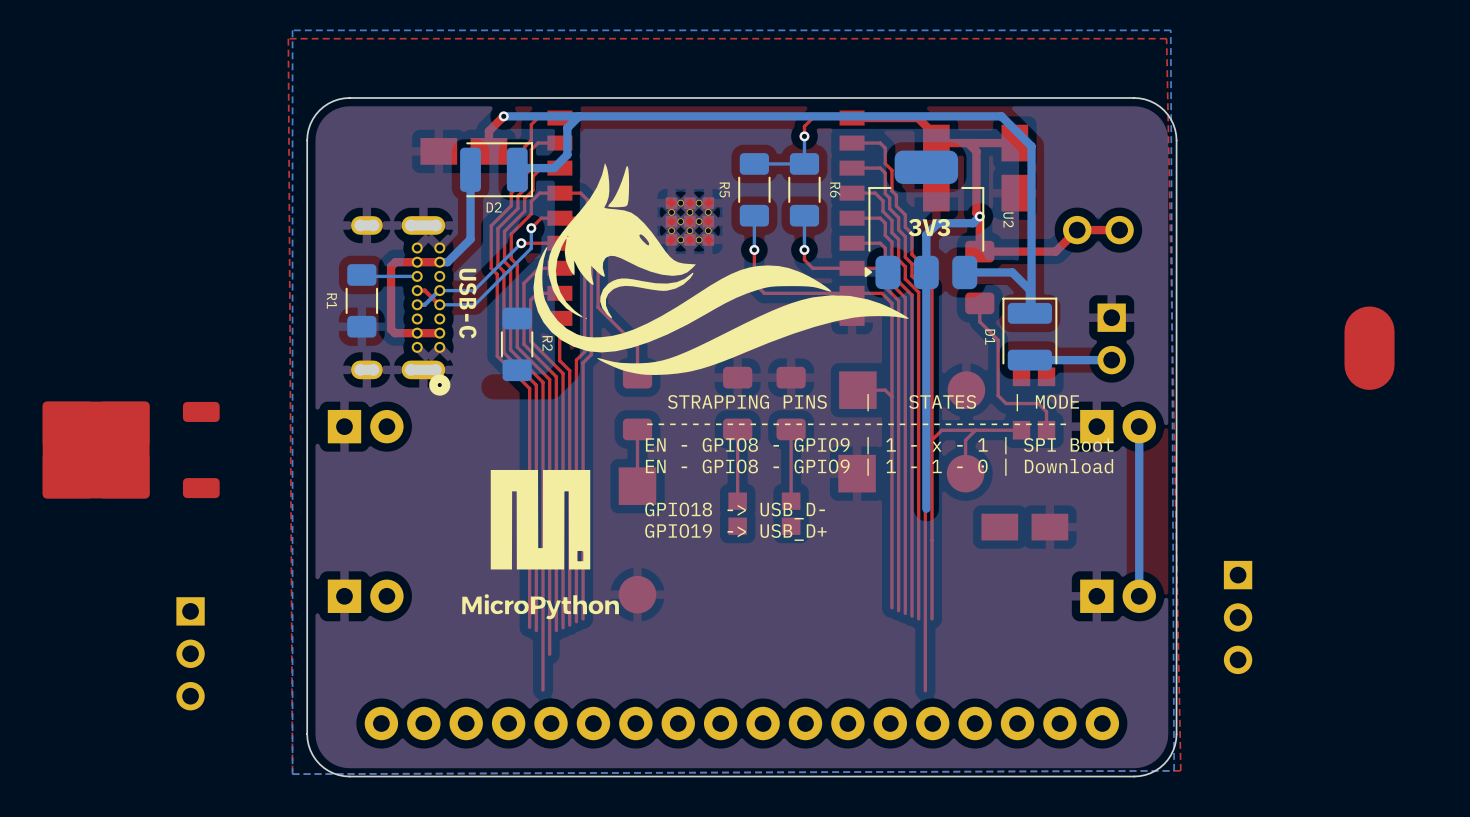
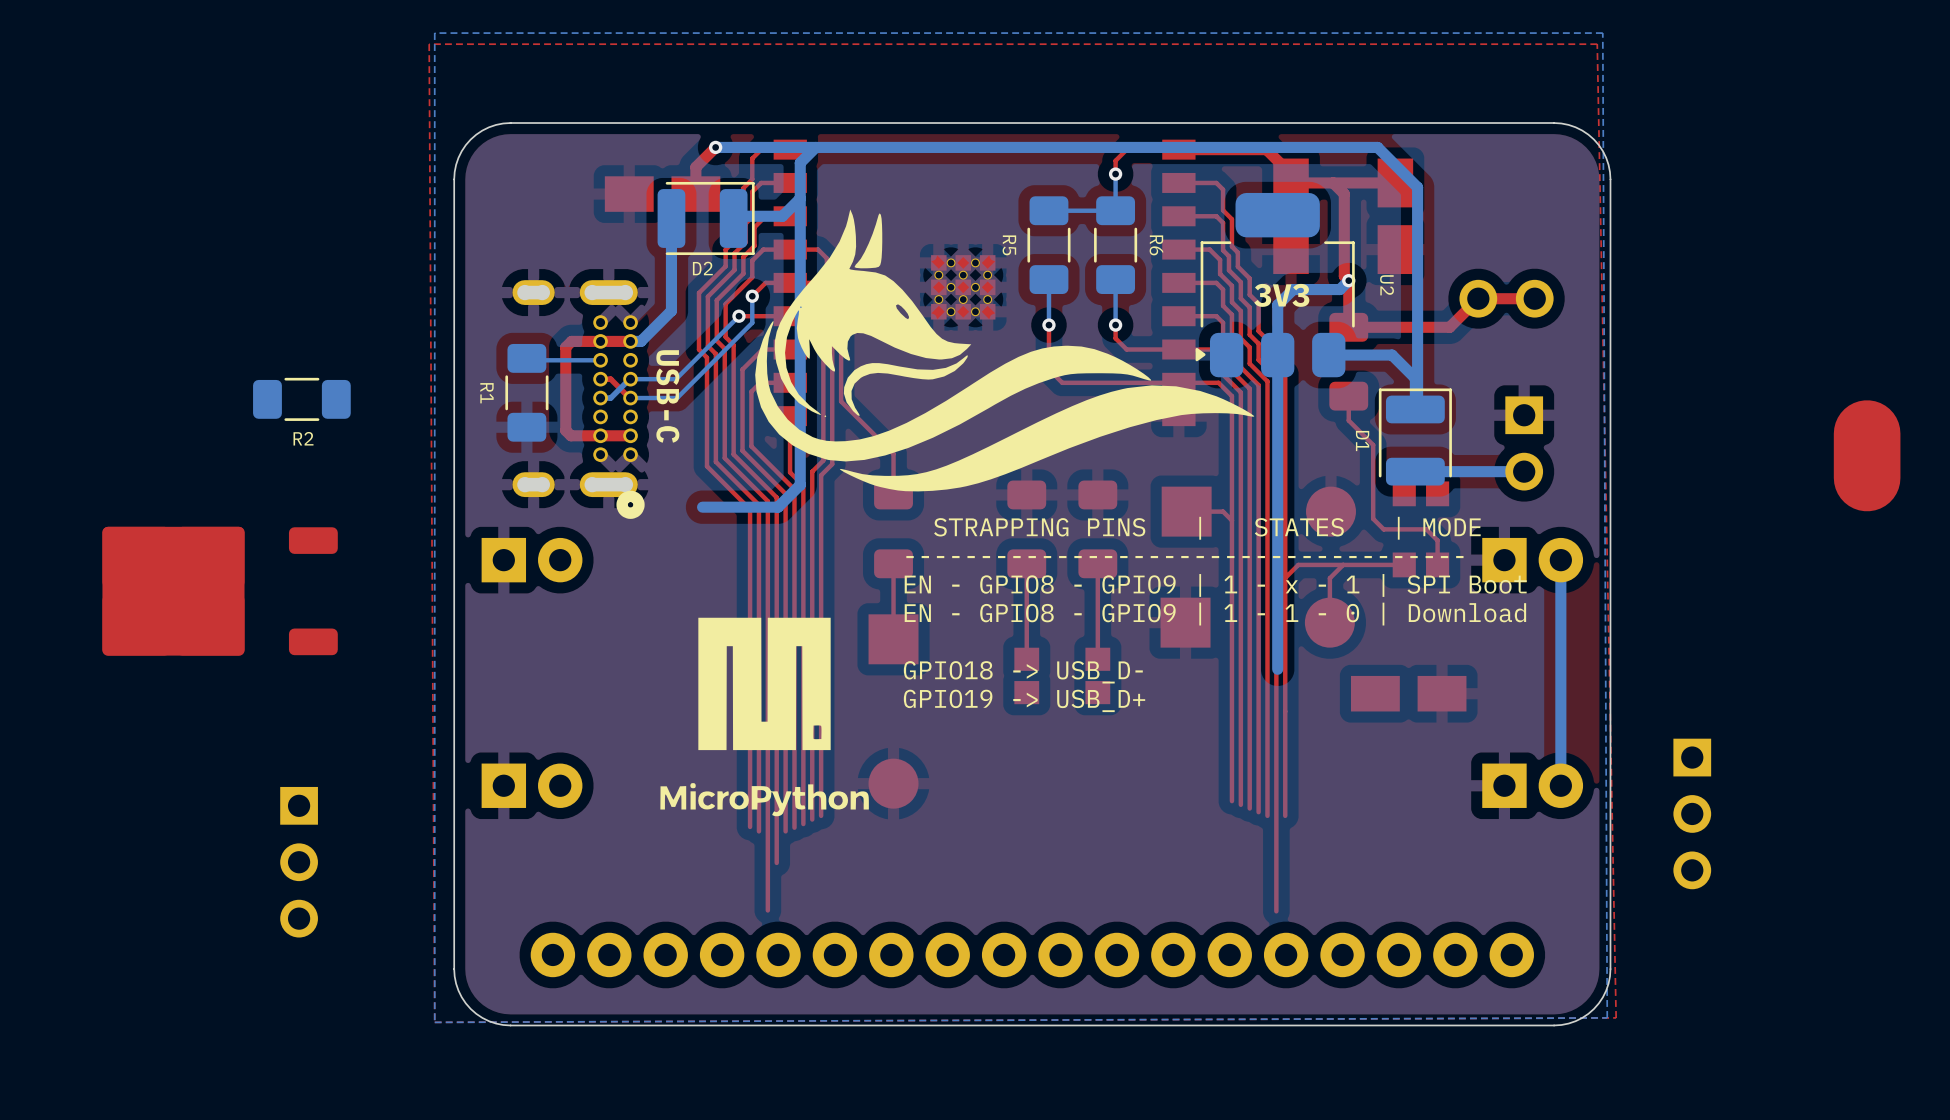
bottom track: none -> (800, 198) (800, 484) (778, 507) (702, 507)
R2 rotation: 0° (517, 344) -> 90° clockwise (301, 399)
R2 position: (517, 344) -> (301, 399)

